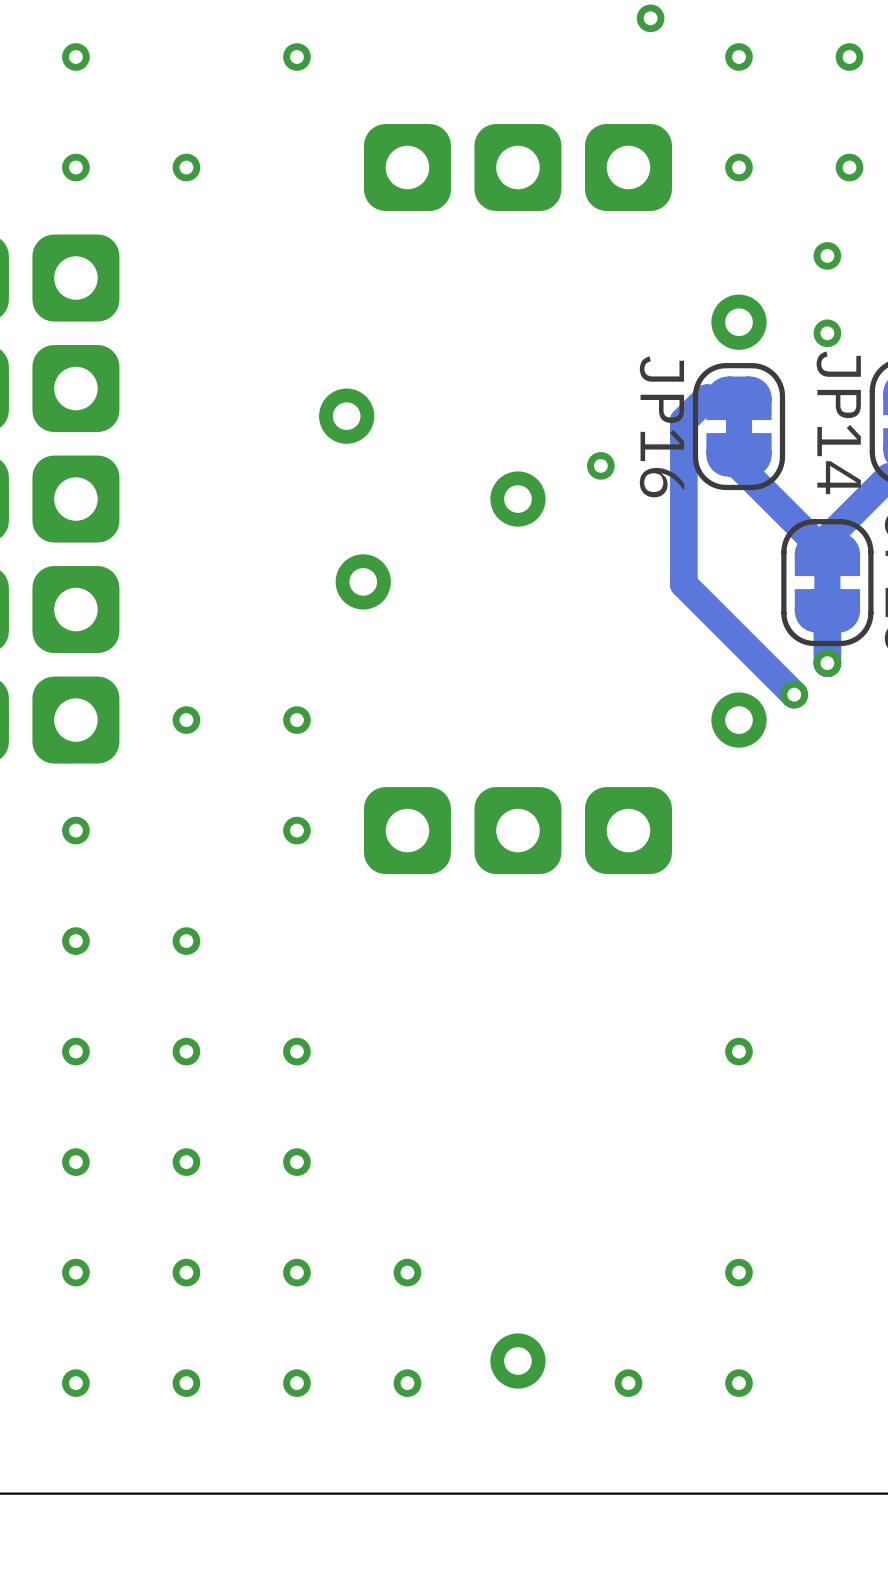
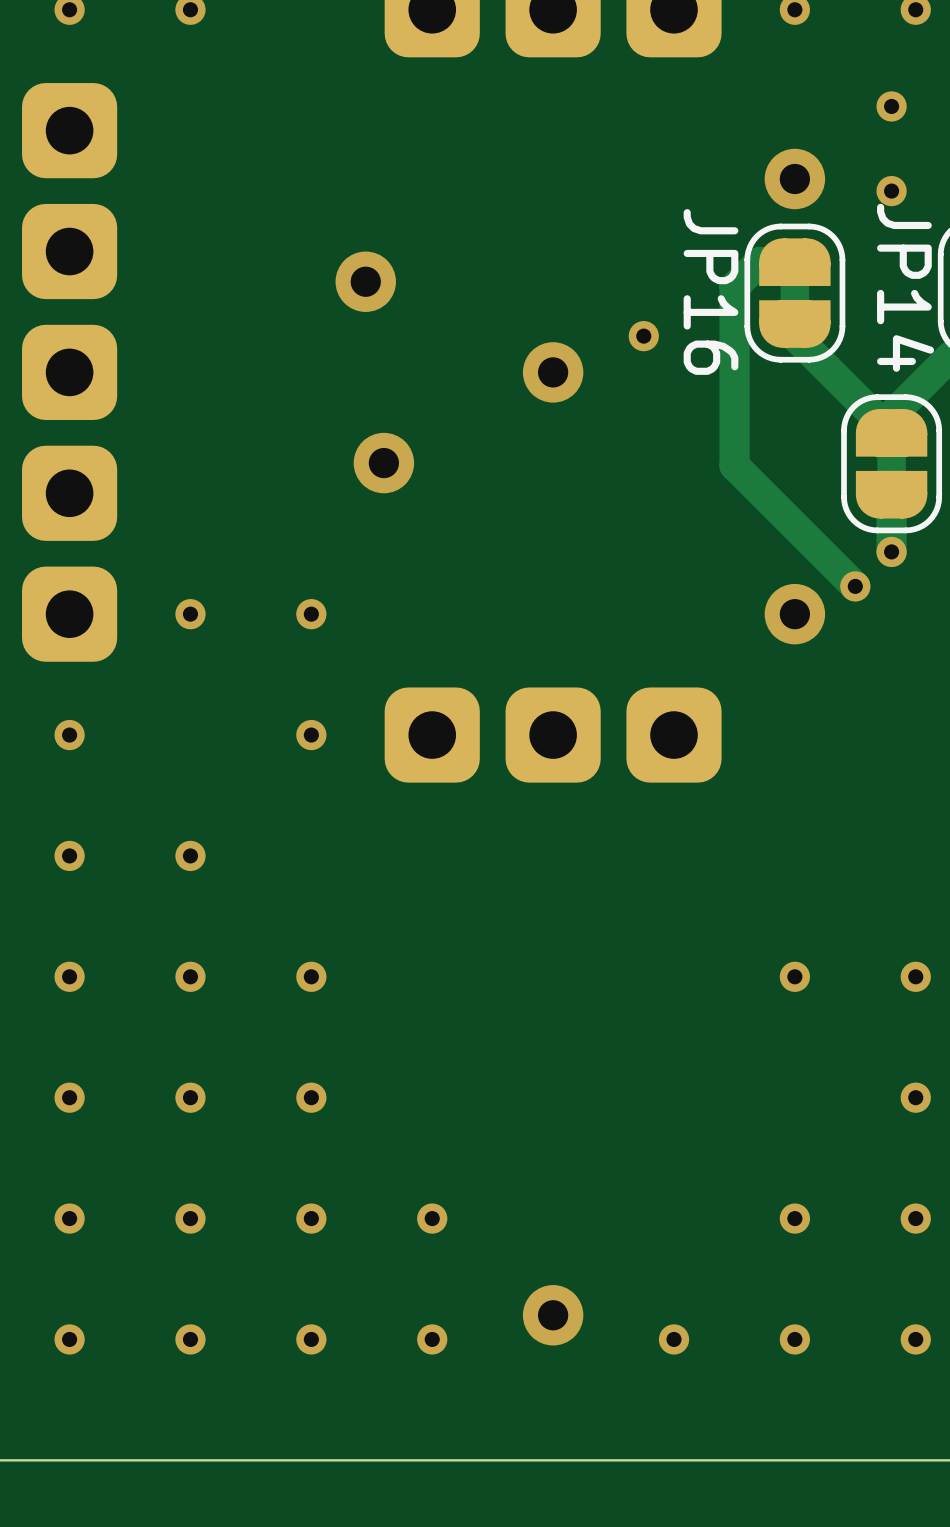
via: none -> (915, 976)
via: none -> (915, 1097)
via: none -> (915, 1218)
via: none -> (915, 1339)

